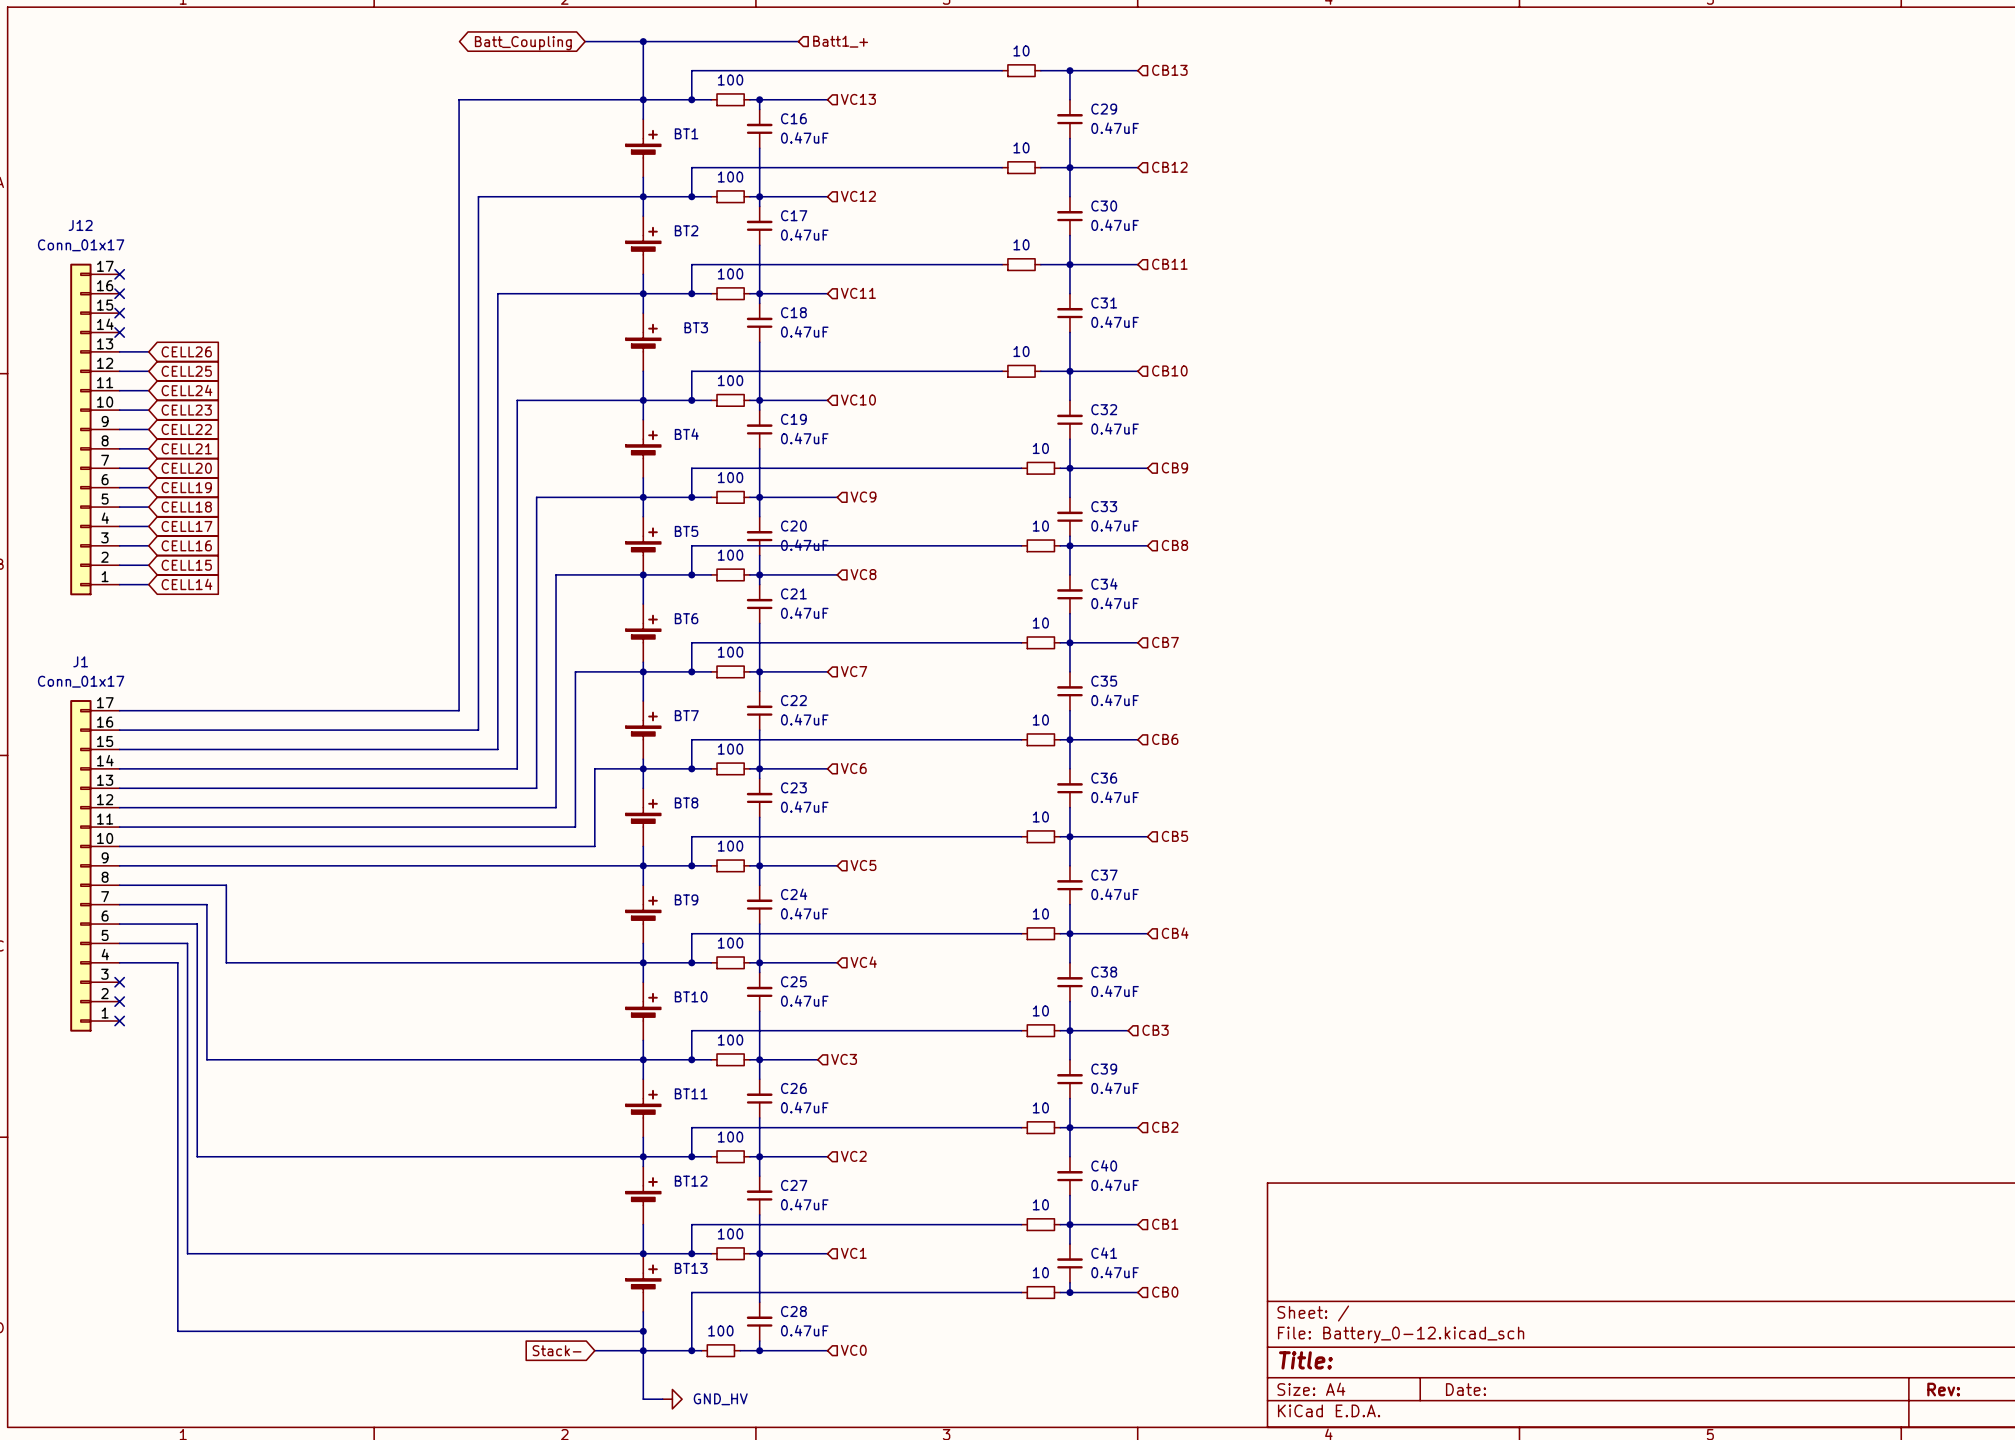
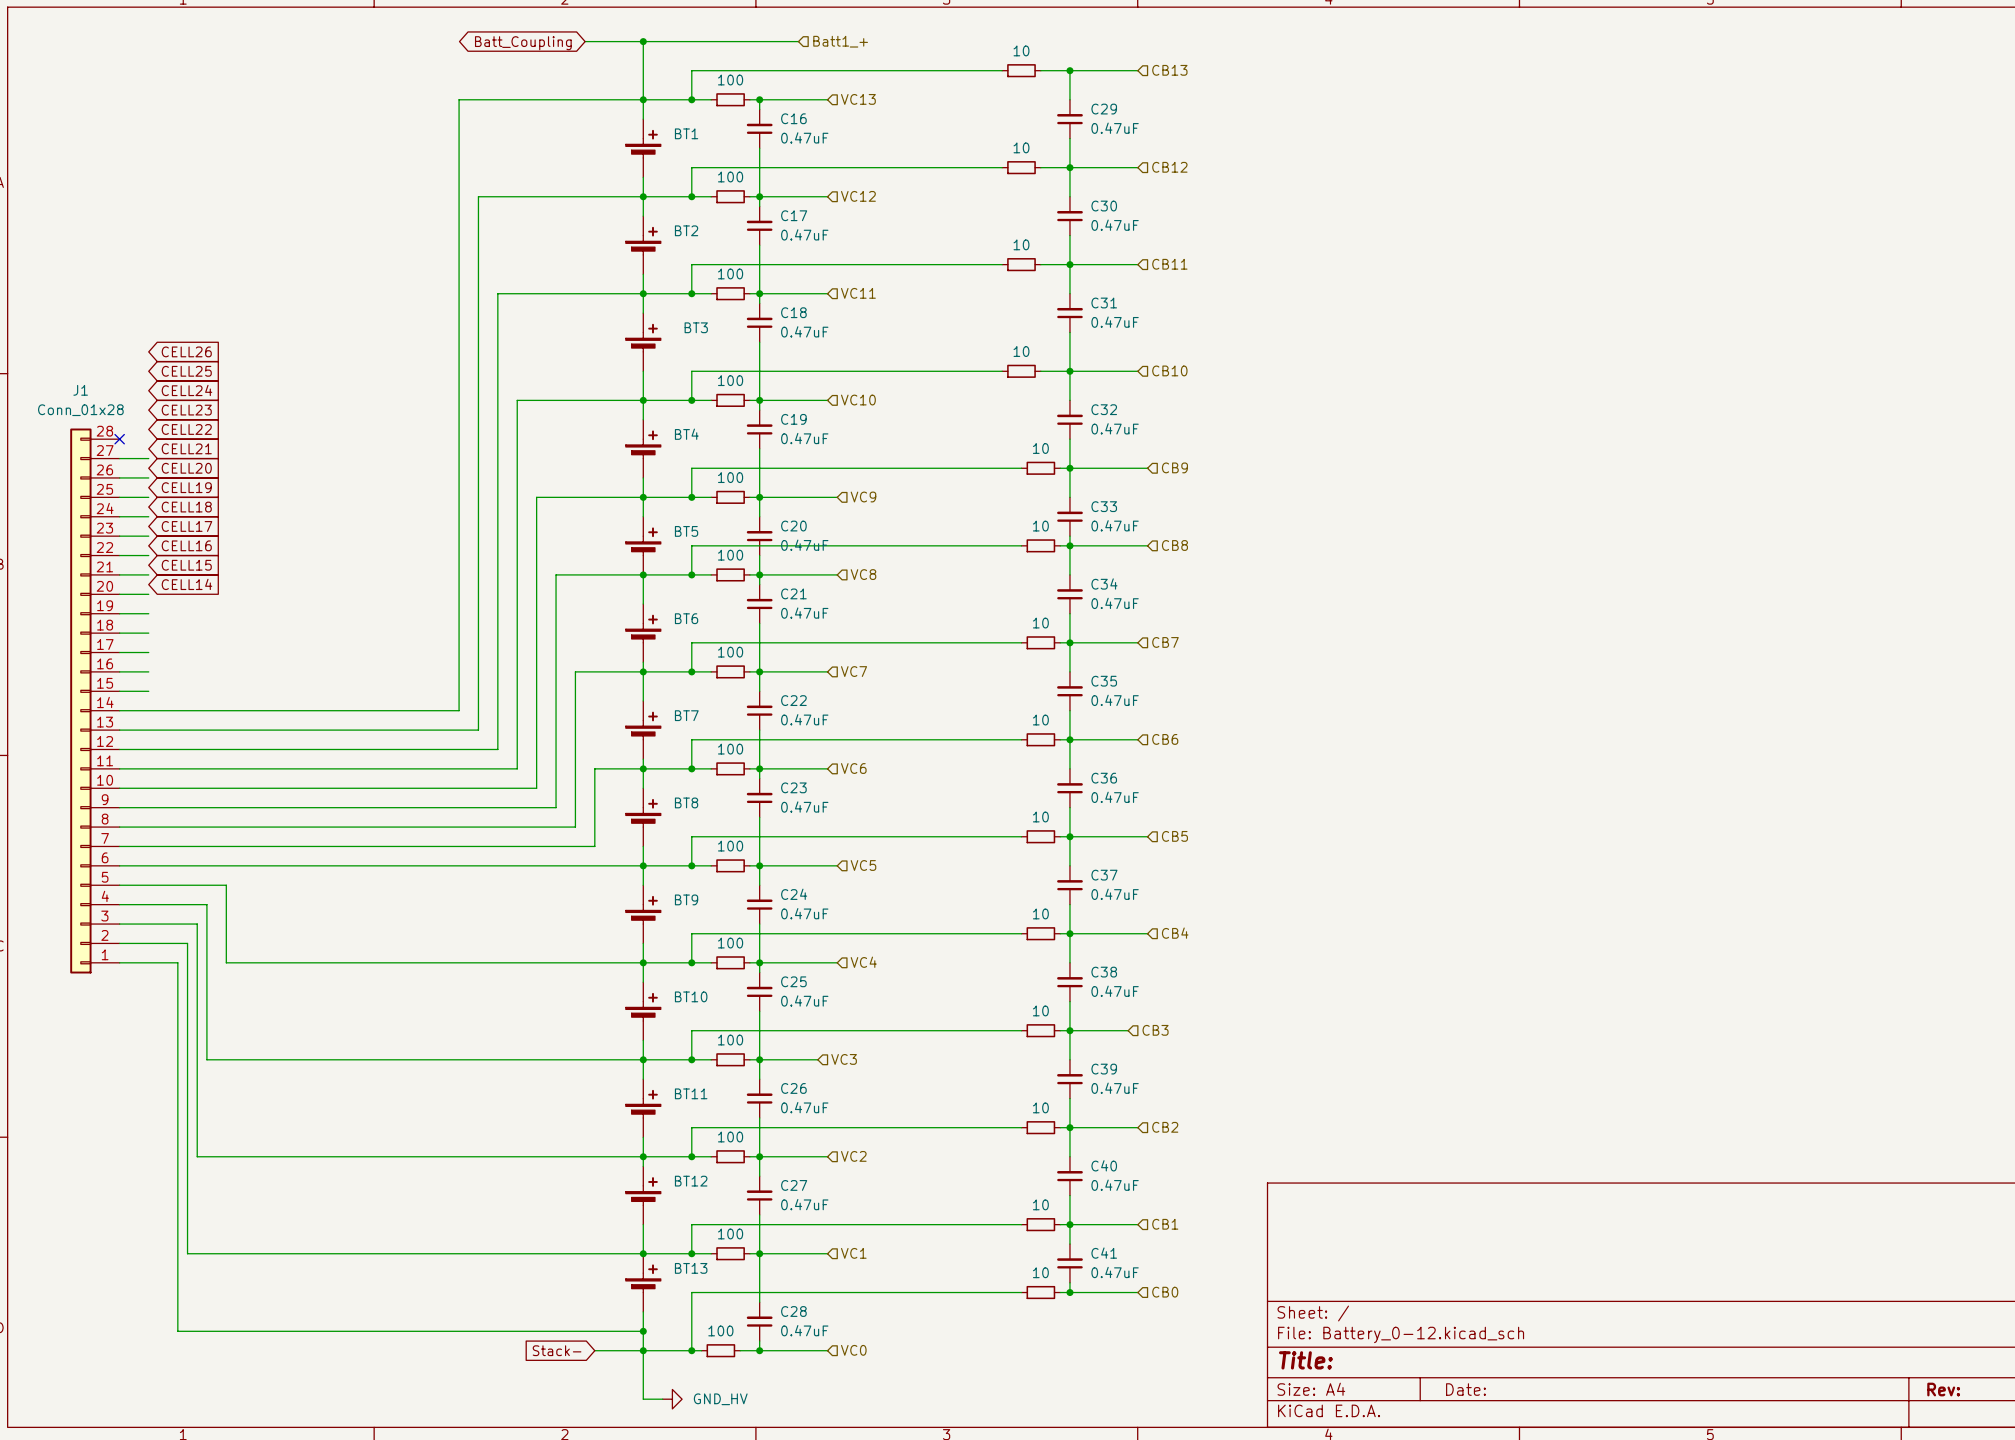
no-connect mark: (119, 274) -> none
no-connect mark: (119, 293) -> none
no-connect mark: (119, 313) -> none
no-connect mark: (119, 332) -> none
wire: (119, 351) (148, 351) -> (119, 458) (148, 458)
wire: (119, 371) (148, 371) -> (119, 477) (148, 477)
wire: (119, 390) (148, 390) -> (119, 497) (148, 497)
wire: (119, 410) (148, 410) -> (119, 516) (148, 516)
J12: Conn_01x17 (94, 429) -> none
wire: (119, 429) (148, 429) -> (119, 536) (148, 536)
no-connect mark: none -> (119, 439)
wire: (119, 448) (148, 448) -> (119, 555) (148, 555)
wire: (119, 468) (148, 468) -> (119, 574) (148, 574)
wire: (119, 487) (148, 487) -> (119, 594) (148, 594)
wire: (119, 507) (148, 507) -> (119, 613) (148, 613)
wire: (119, 526) (148, 526) -> (119, 633) (148, 633)
wire: (119, 545) (148, 545) -> (119, 652) (148, 652)
wire: (119, 565) (148, 565) -> (119, 671) (148, 671)
wire: (119, 584) (148, 584) -> (119, 691) (148, 691)
J1 name position: J1 (80, 661) -> J1 (80, 390)
J1 value: Conn_01x17 (81, 681) -> Conn_01x28 (80, 410)
J1 symbol: [70, 700, 120, 1032] -> [70, 428, 120, 974]
no-connect mark: (119, 982) -> none
no-connect mark: (119, 1001) -> none
no-connect mark: (119, 1021) -> none

